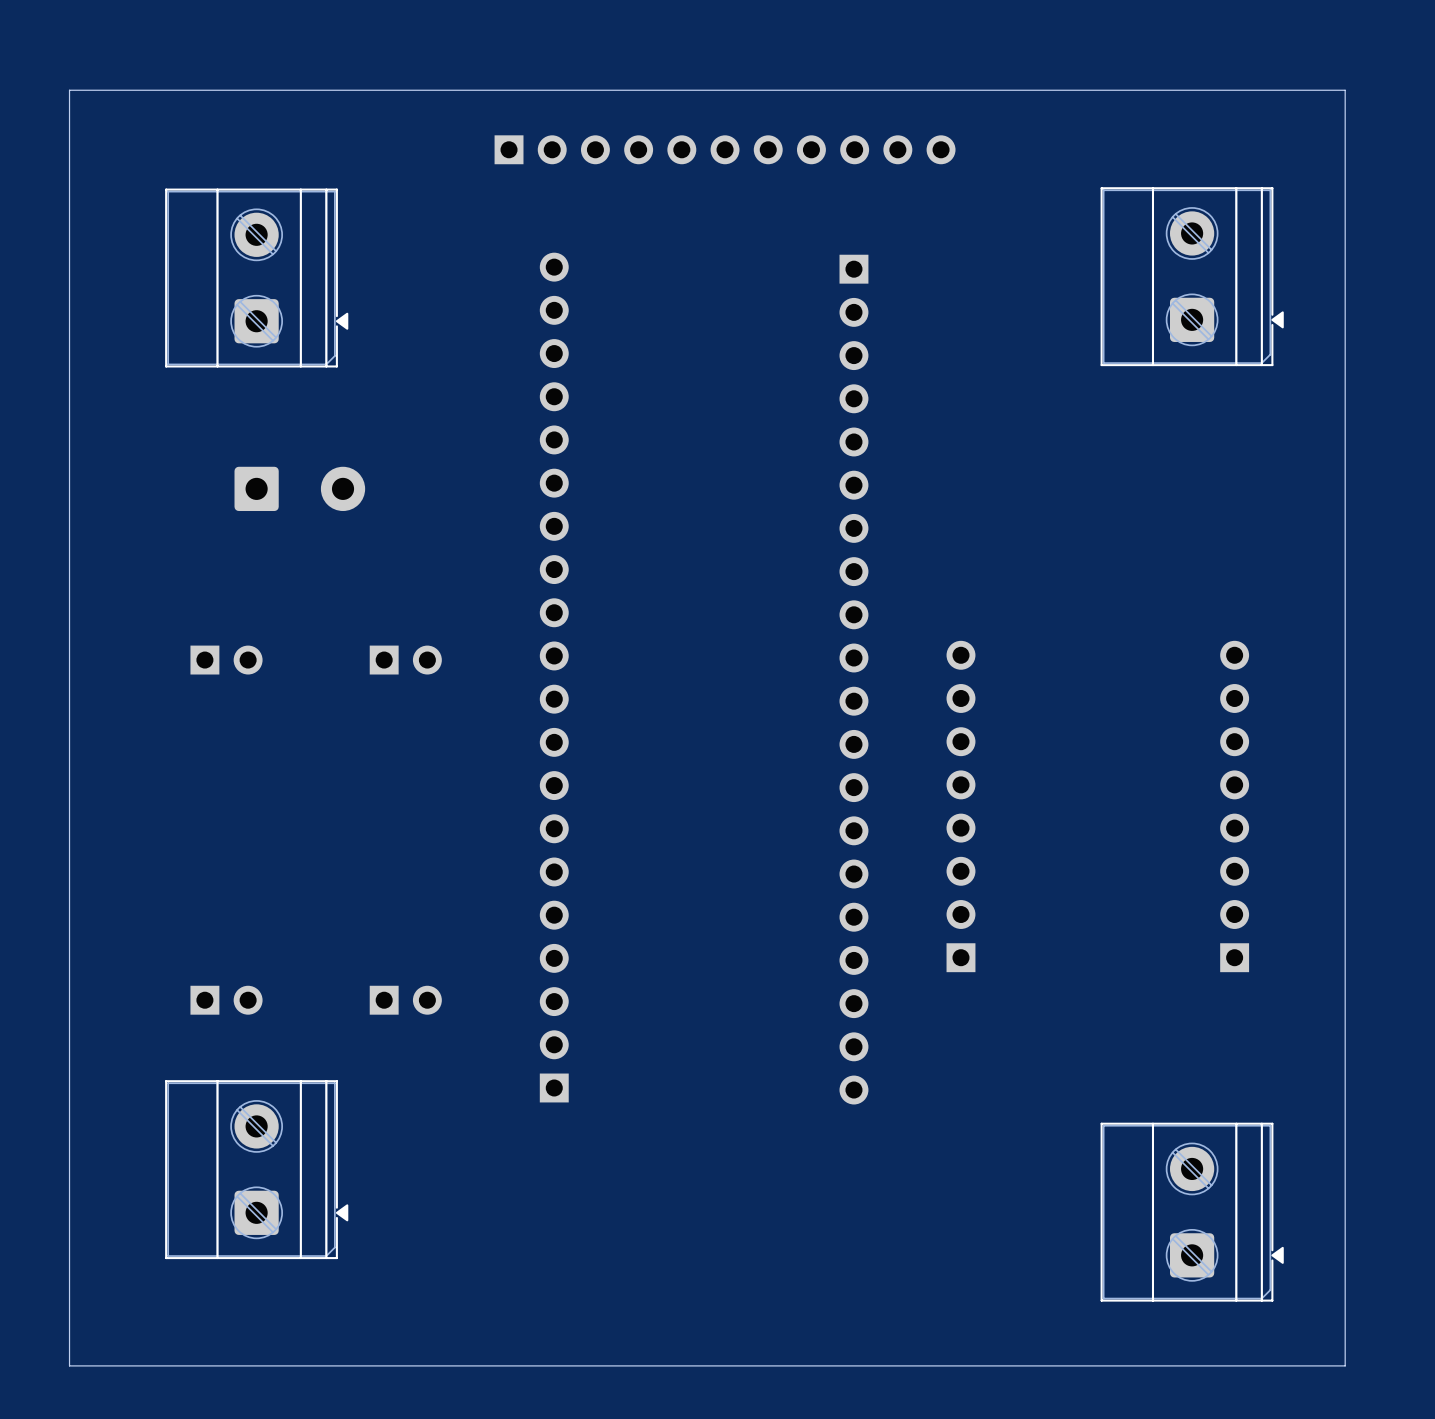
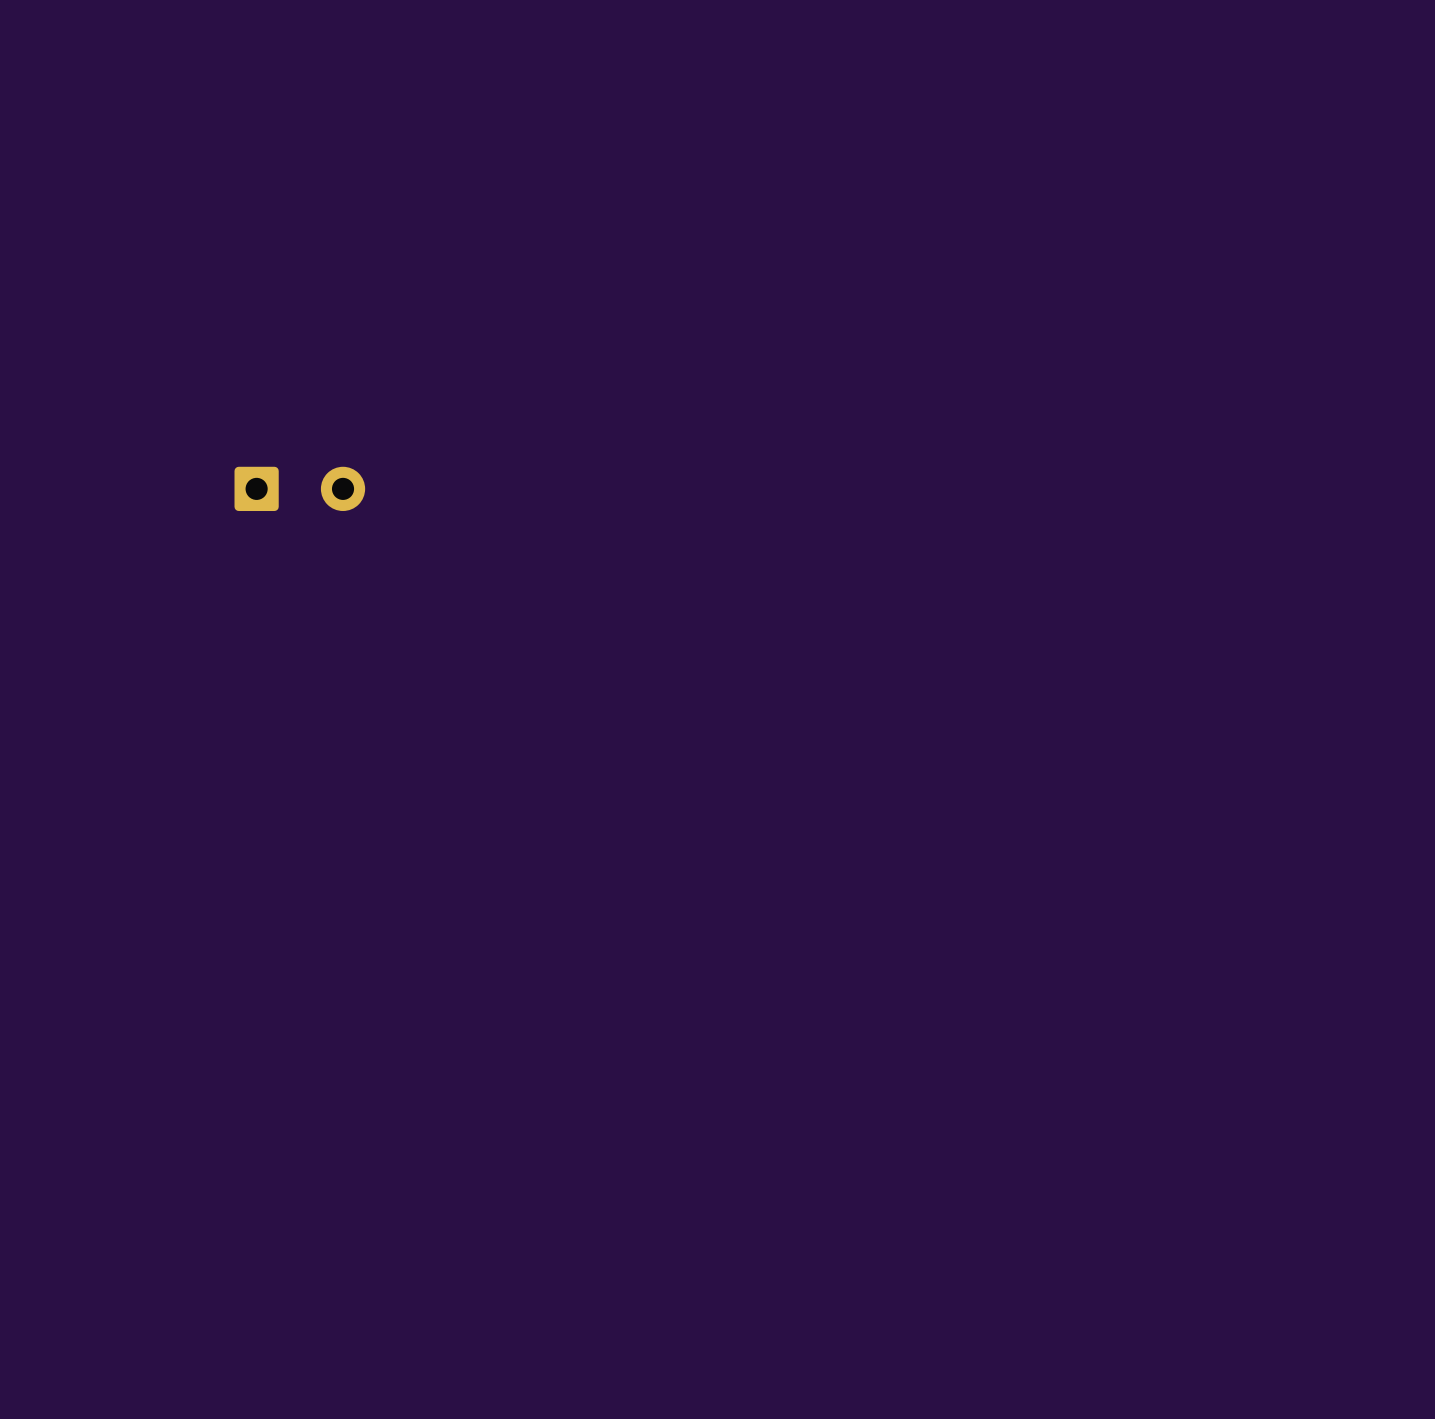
board edge: (1345, 90) (69, 90) (69, 1365) (1345, 1365) (1345, 90) -> none
part: (725, 149) -> none
part: (1192, 276) -> none
part: (256, 278) -> none
part: (226, 660) -> none
part: (405, 660) -> none
part: (554, 677) -> none
part: (853, 679) -> none
part: (960, 806) -> none
part: (1234, 806) -> none
part: (226, 1000) -> none
part: (405, 1000) -> none
part: (256, 1169) -> none
part: (1192, 1212) -> none

